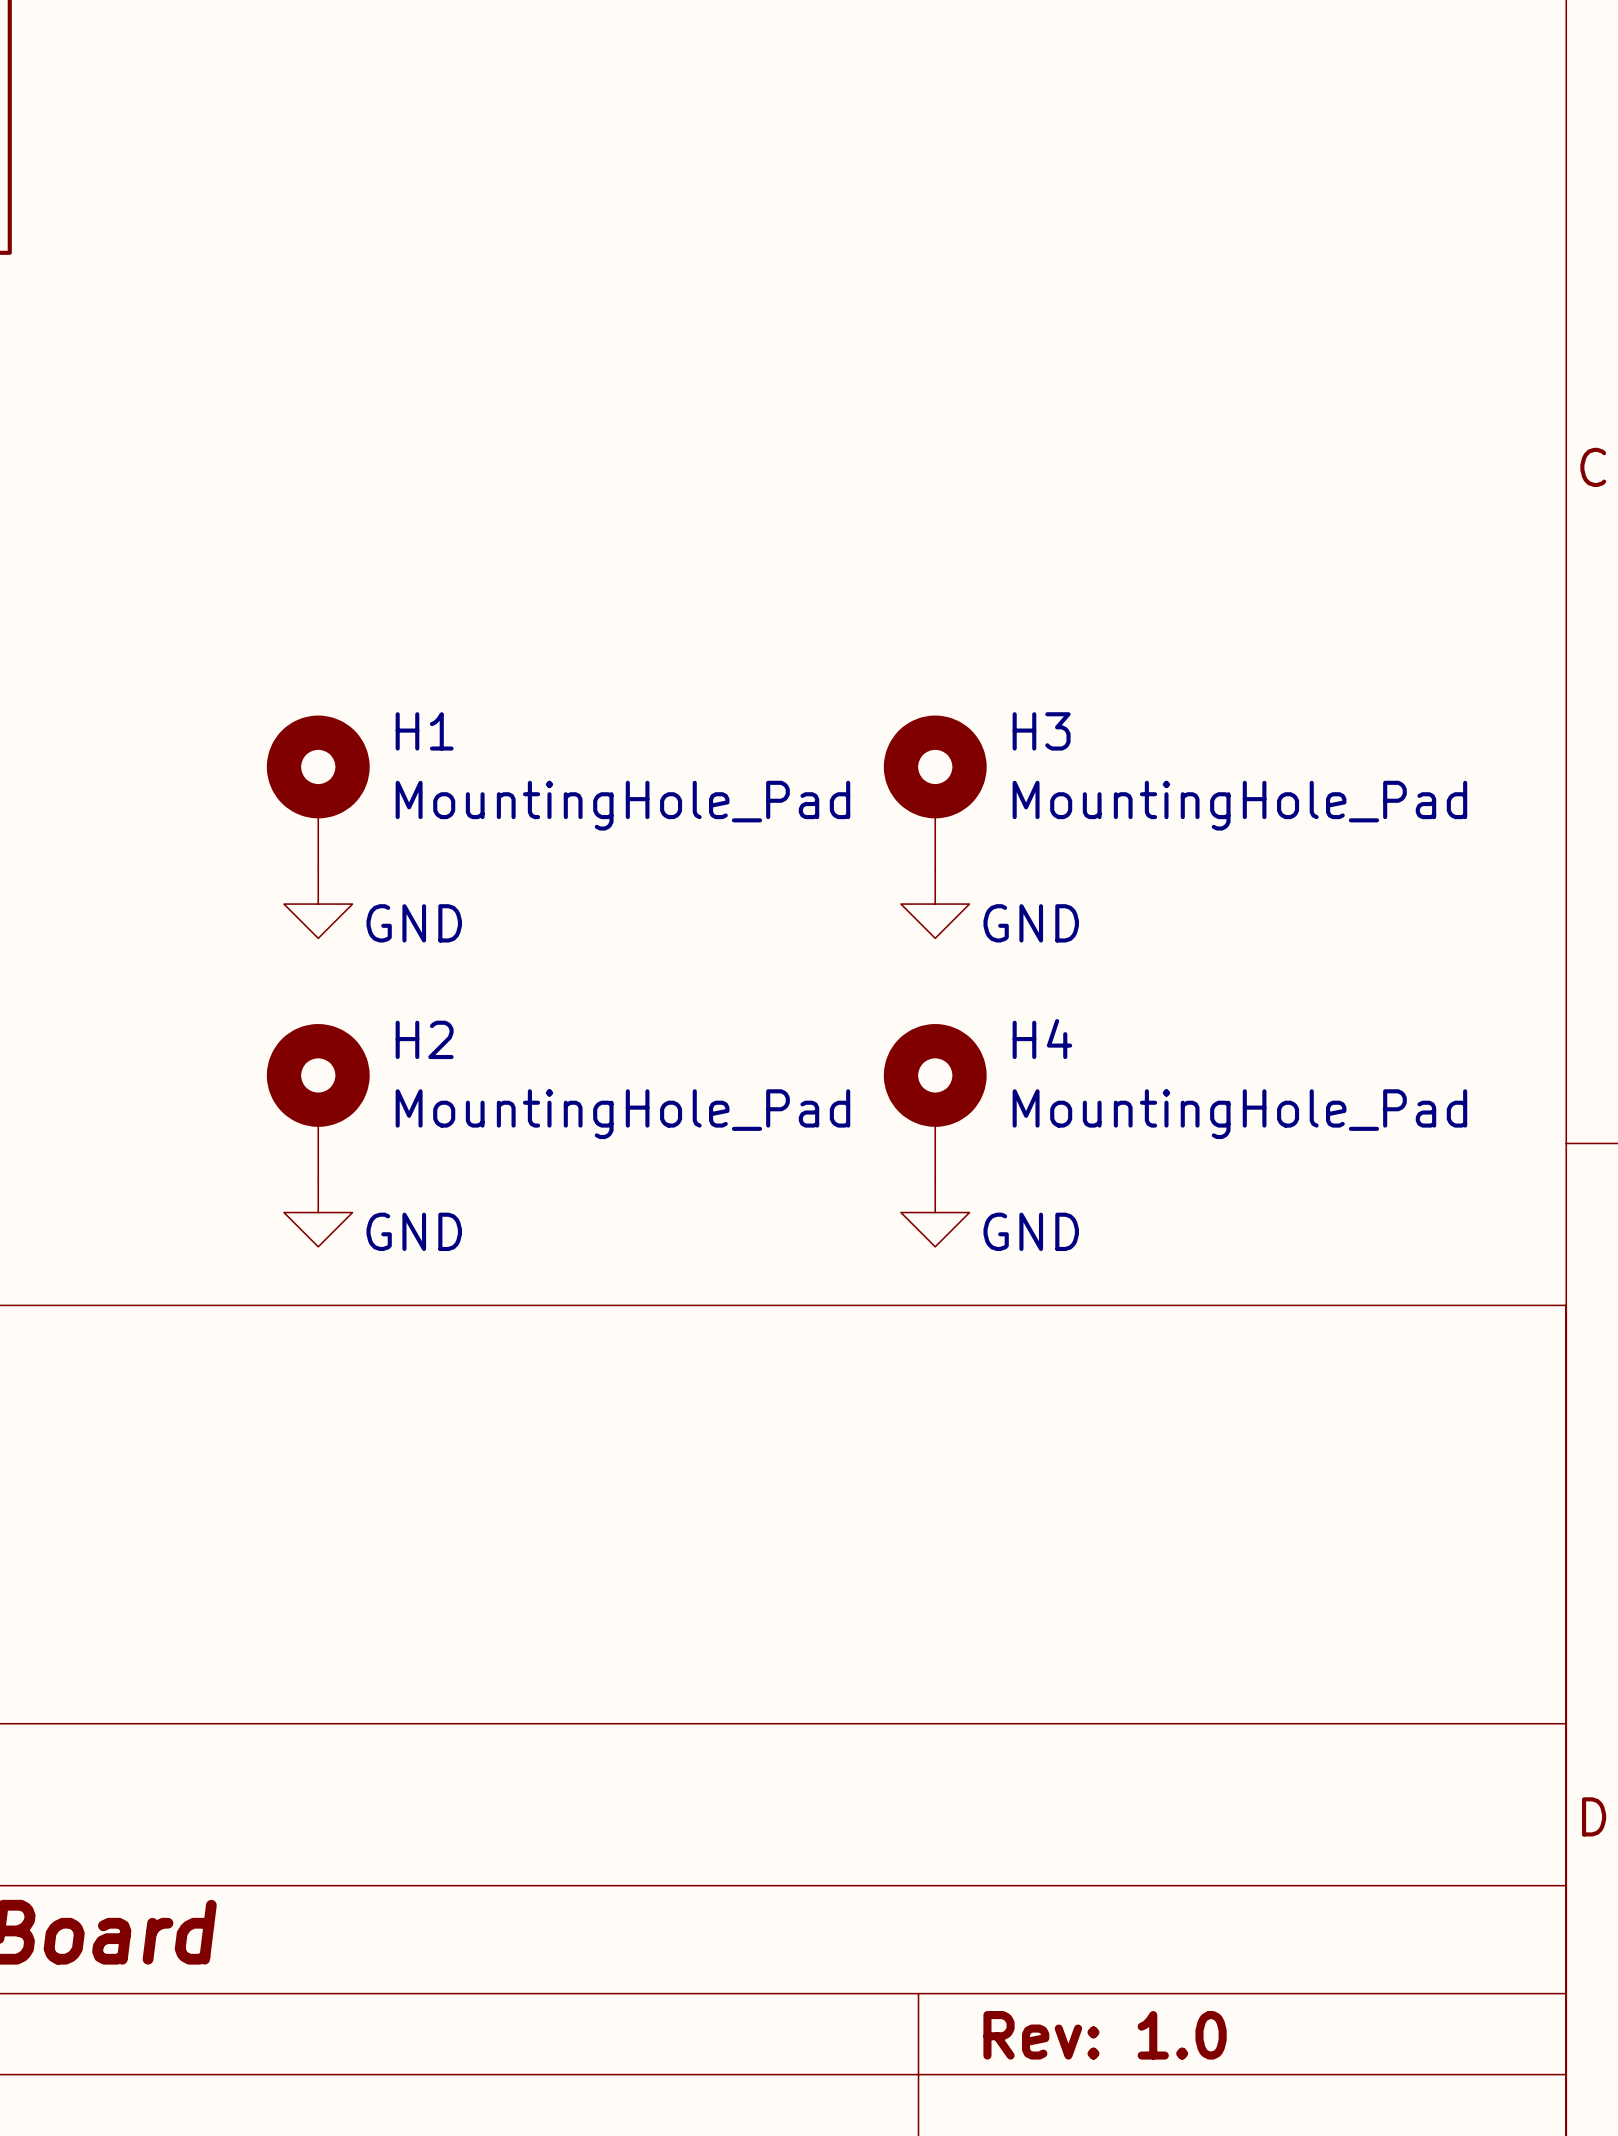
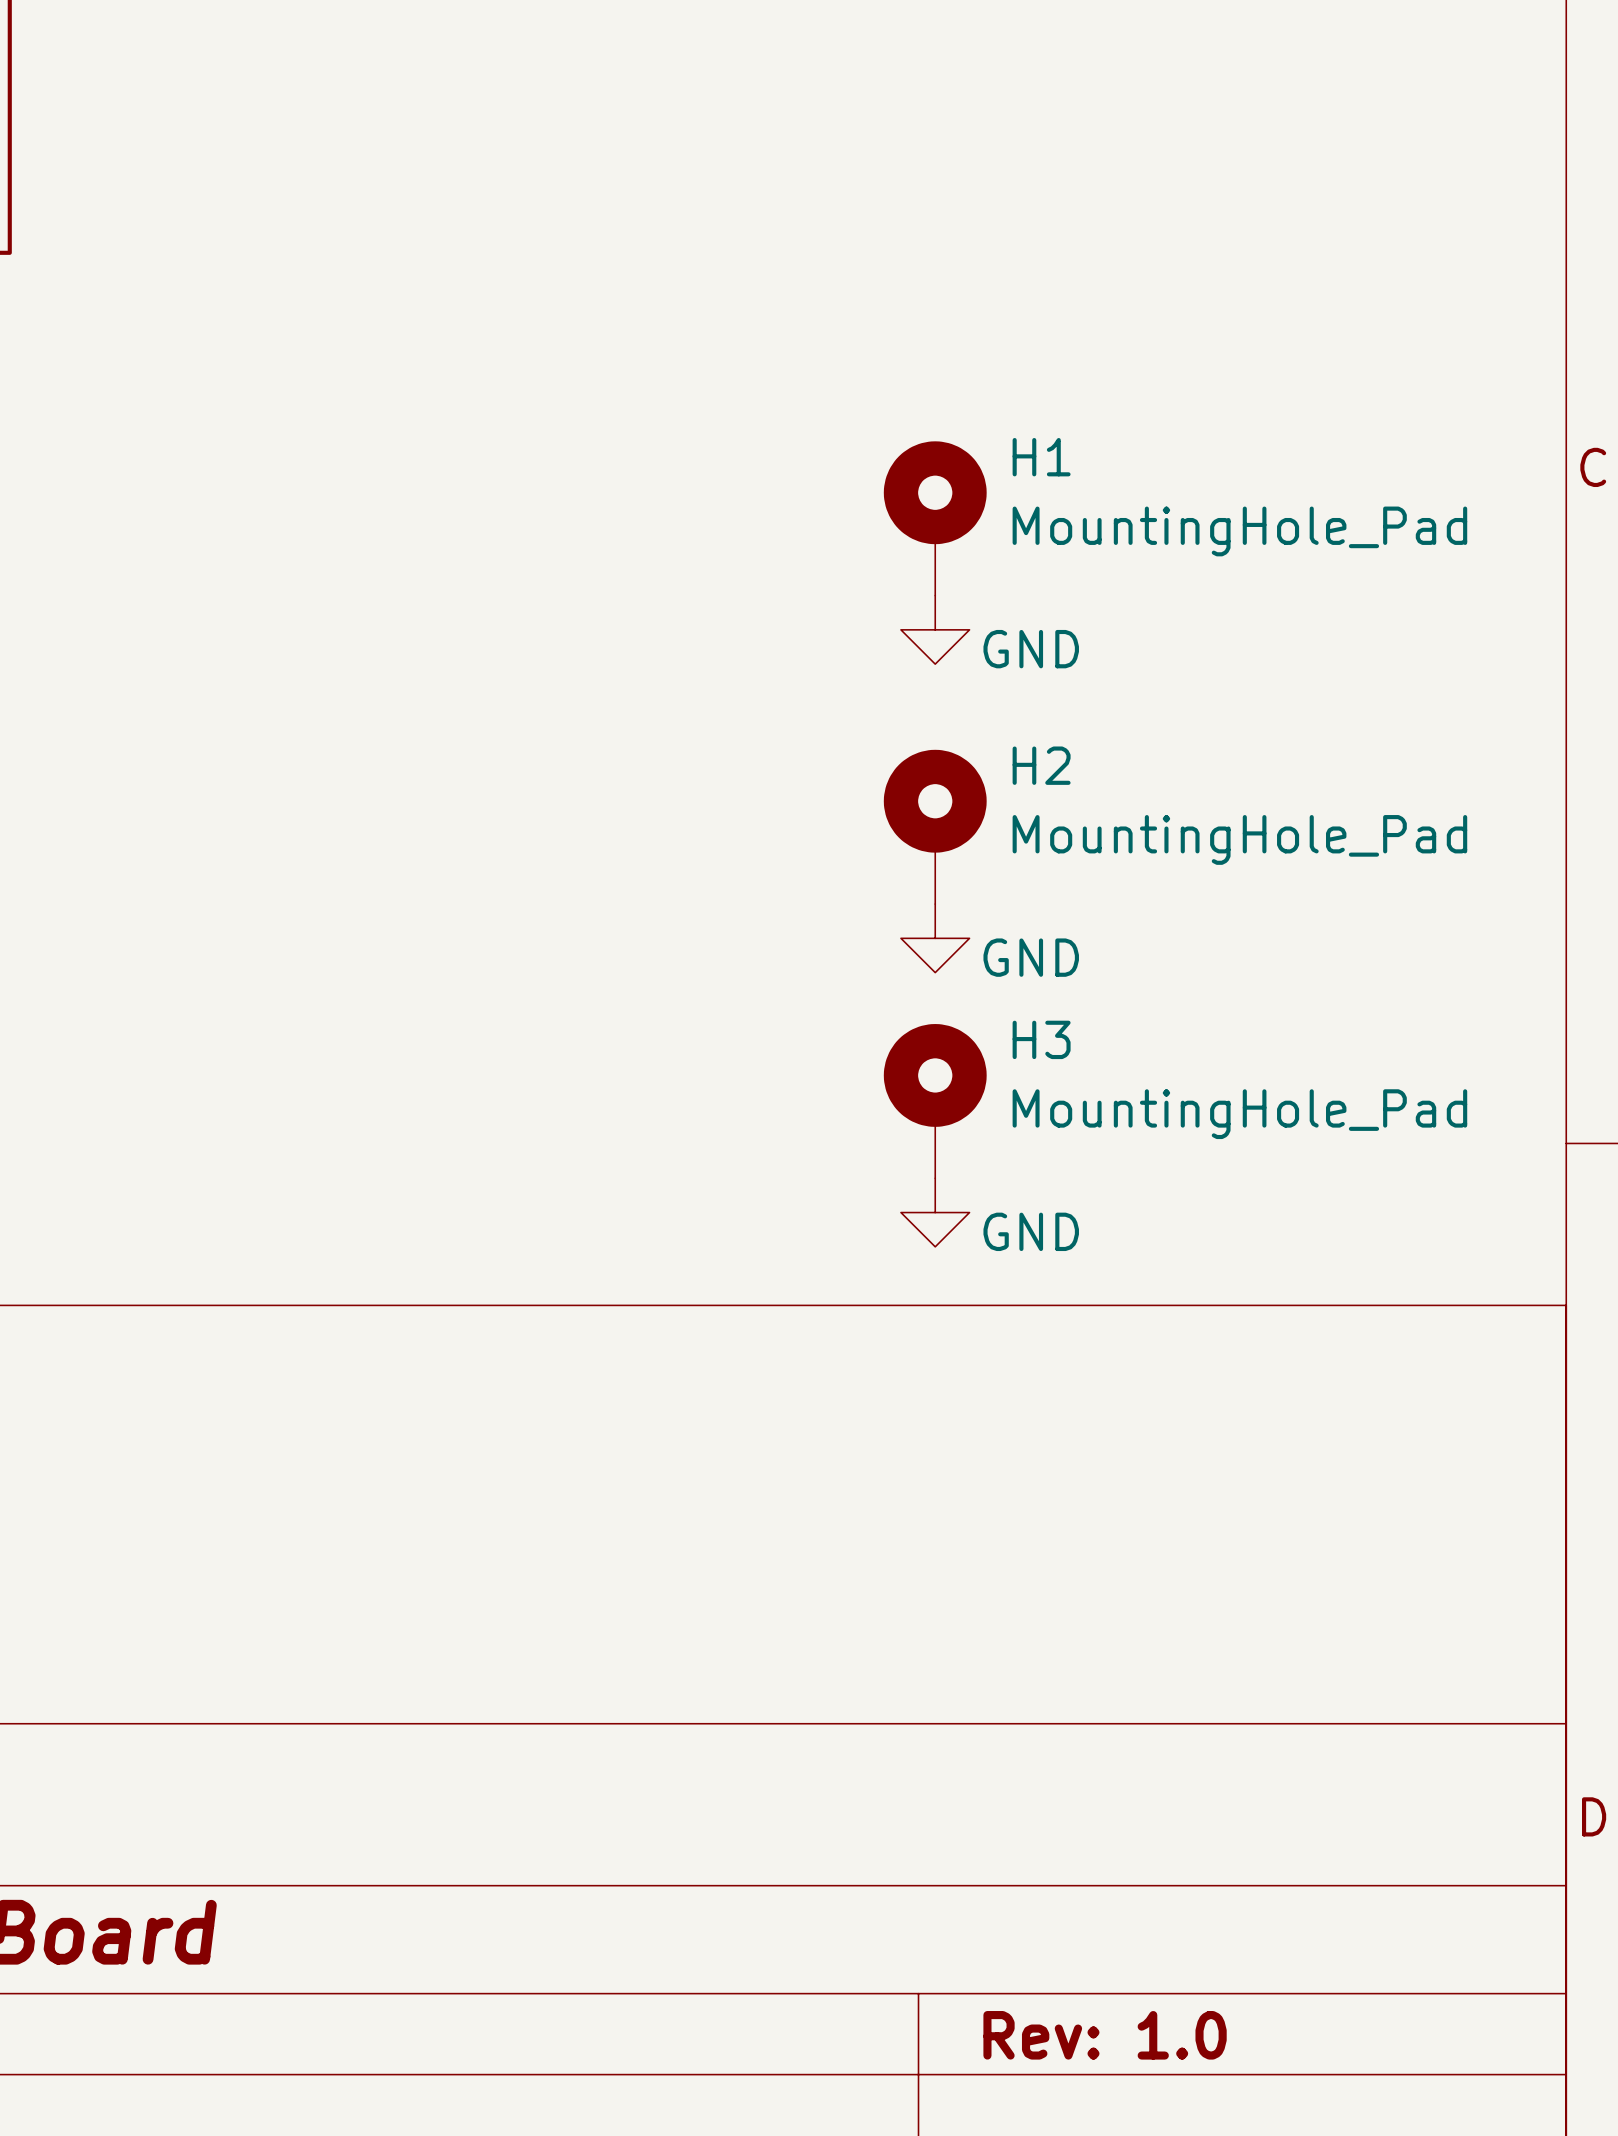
power symbol: none -> GND (935, 629)
H1 position: (318, 792) -> (935, 518)
H3: MountingHole_Pad (935, 792) -> none
power symbol: GND (318, 904) -> none
power symbol position: GND (935, 904) -> GND (935, 938)
H4 name: H4 (1042, 1039) -> H3 (1041, 1039)
H2 position: (318, 1101) -> (935, 826)
power symbol: GND (318, 1212) -> none

